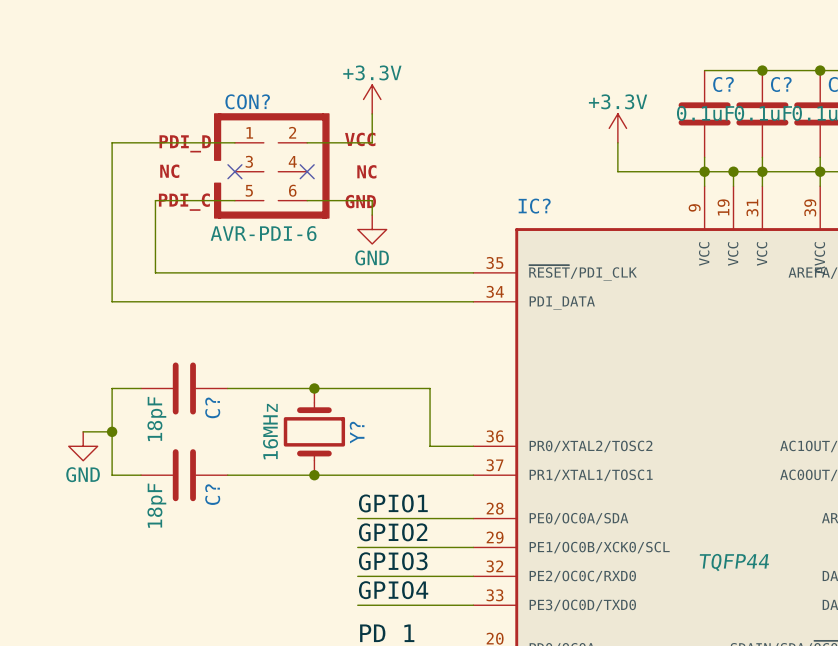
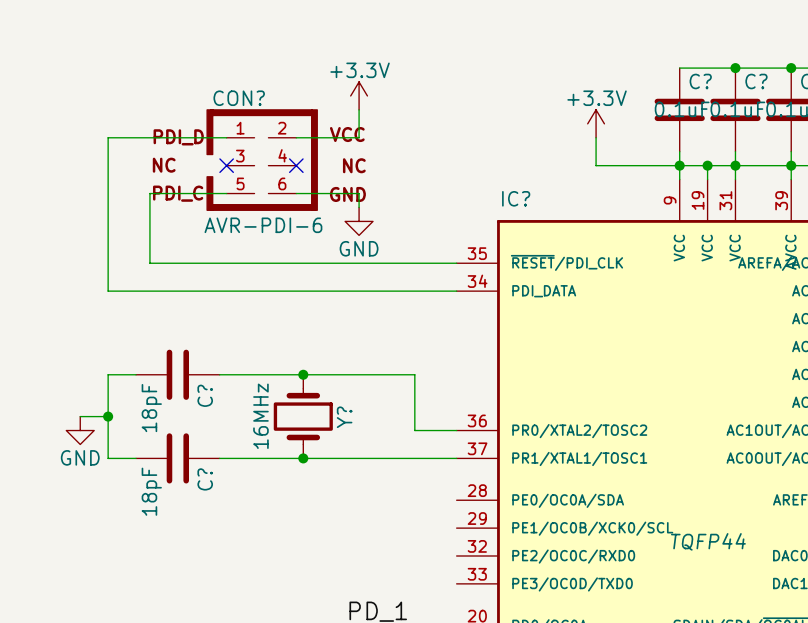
label: GPIO1 (393, 503) -> none
wire: (357, 518) (473, 518) -> none
label: GPIO2 (393, 532) -> none
wire: (357, 547) (473, 547) -> none
label: GPIO3 (393, 561) -> none
wire: (357, 576) (473, 576) -> none
label: GPIO4 (393, 590) -> none
wire: (357, 605) (473, 605) -> none

